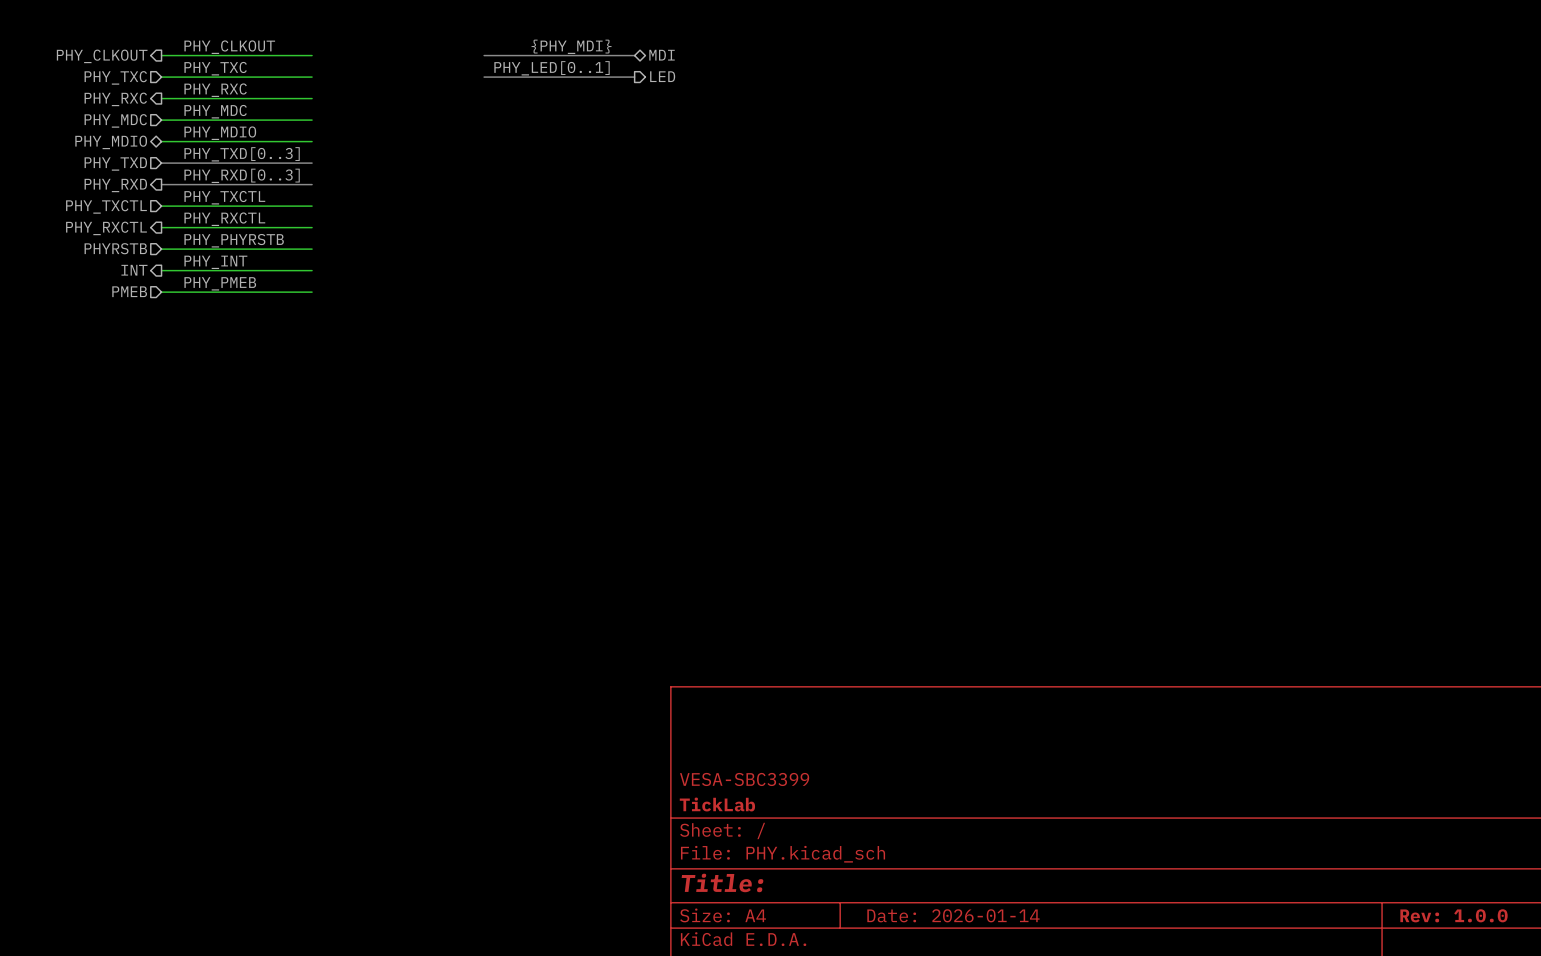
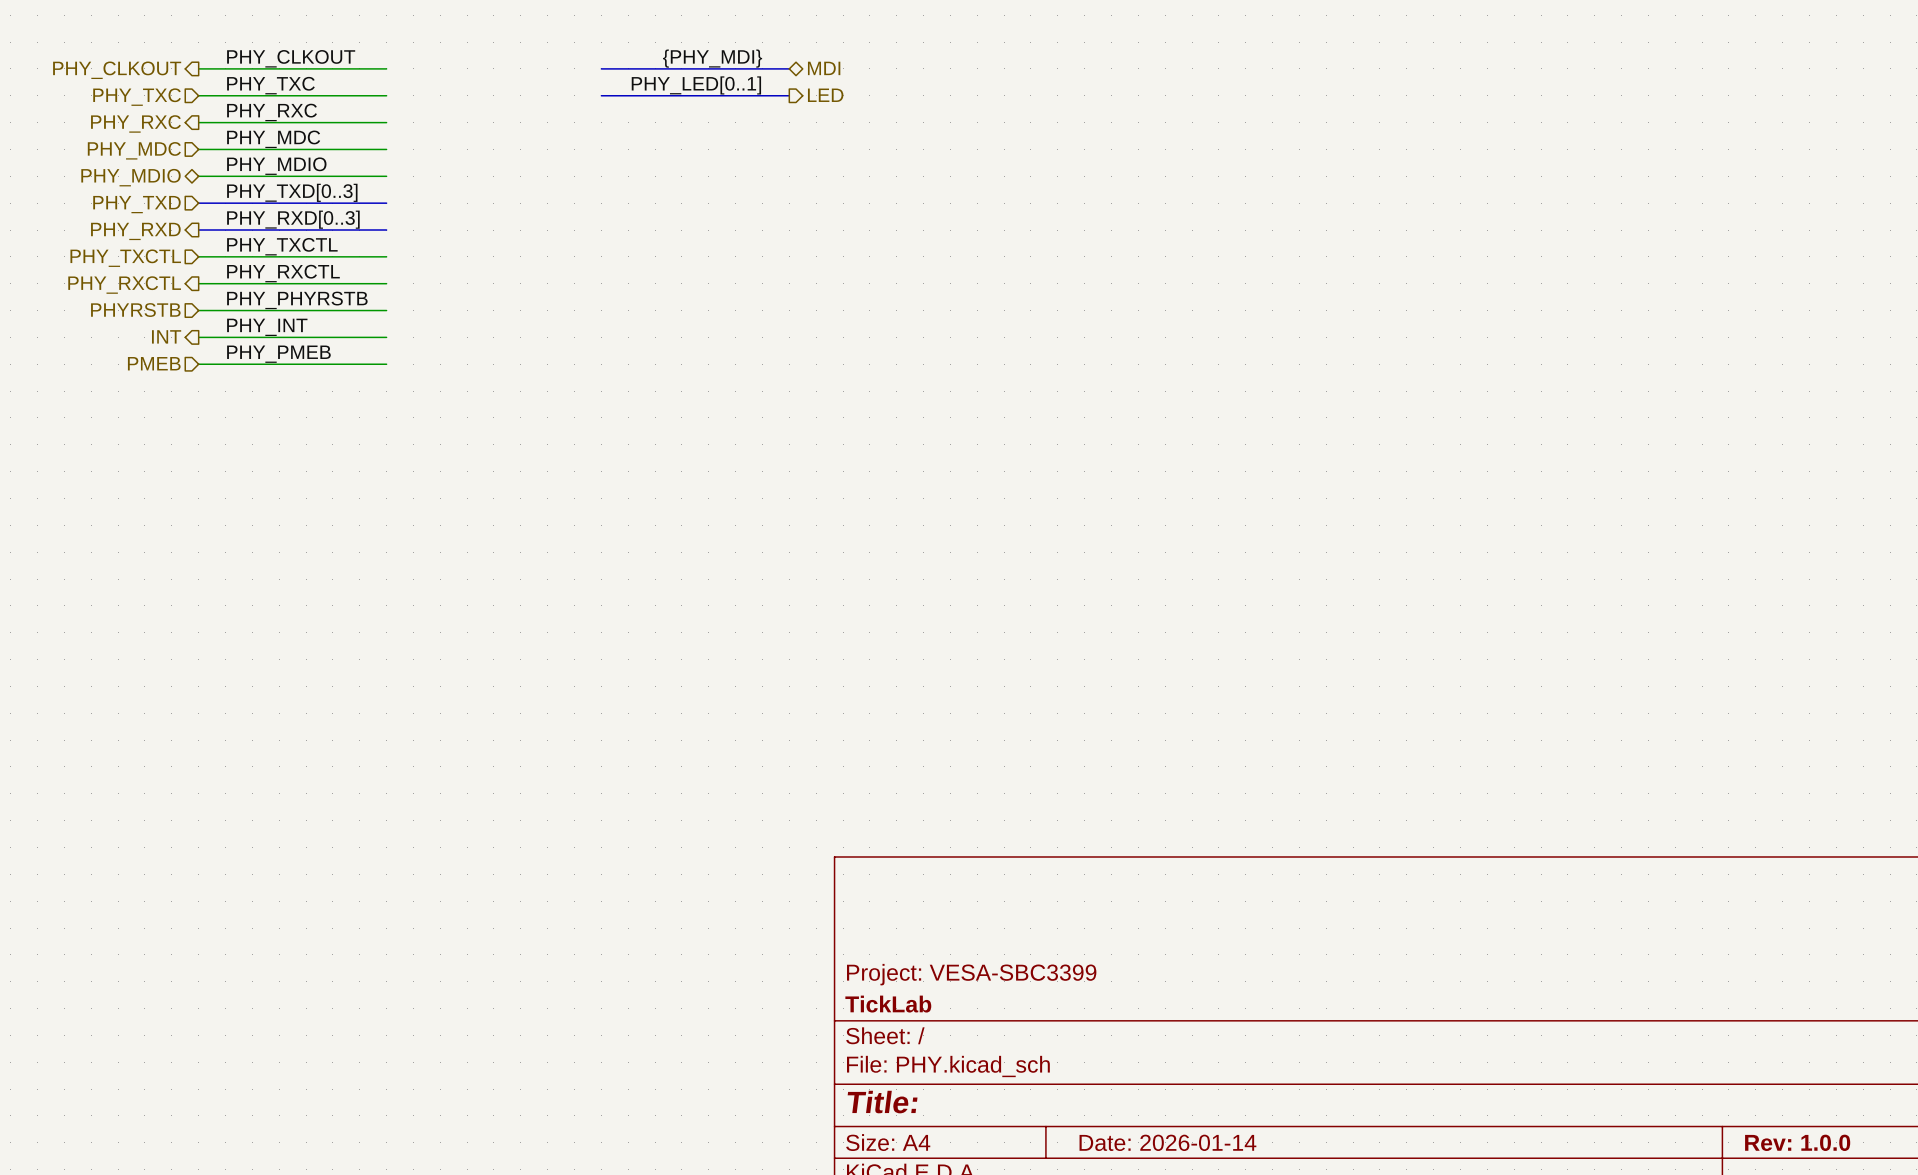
title block: VESA-SBC3399 (744, 779) -> Project: VESA-SBC3399 (971, 974)

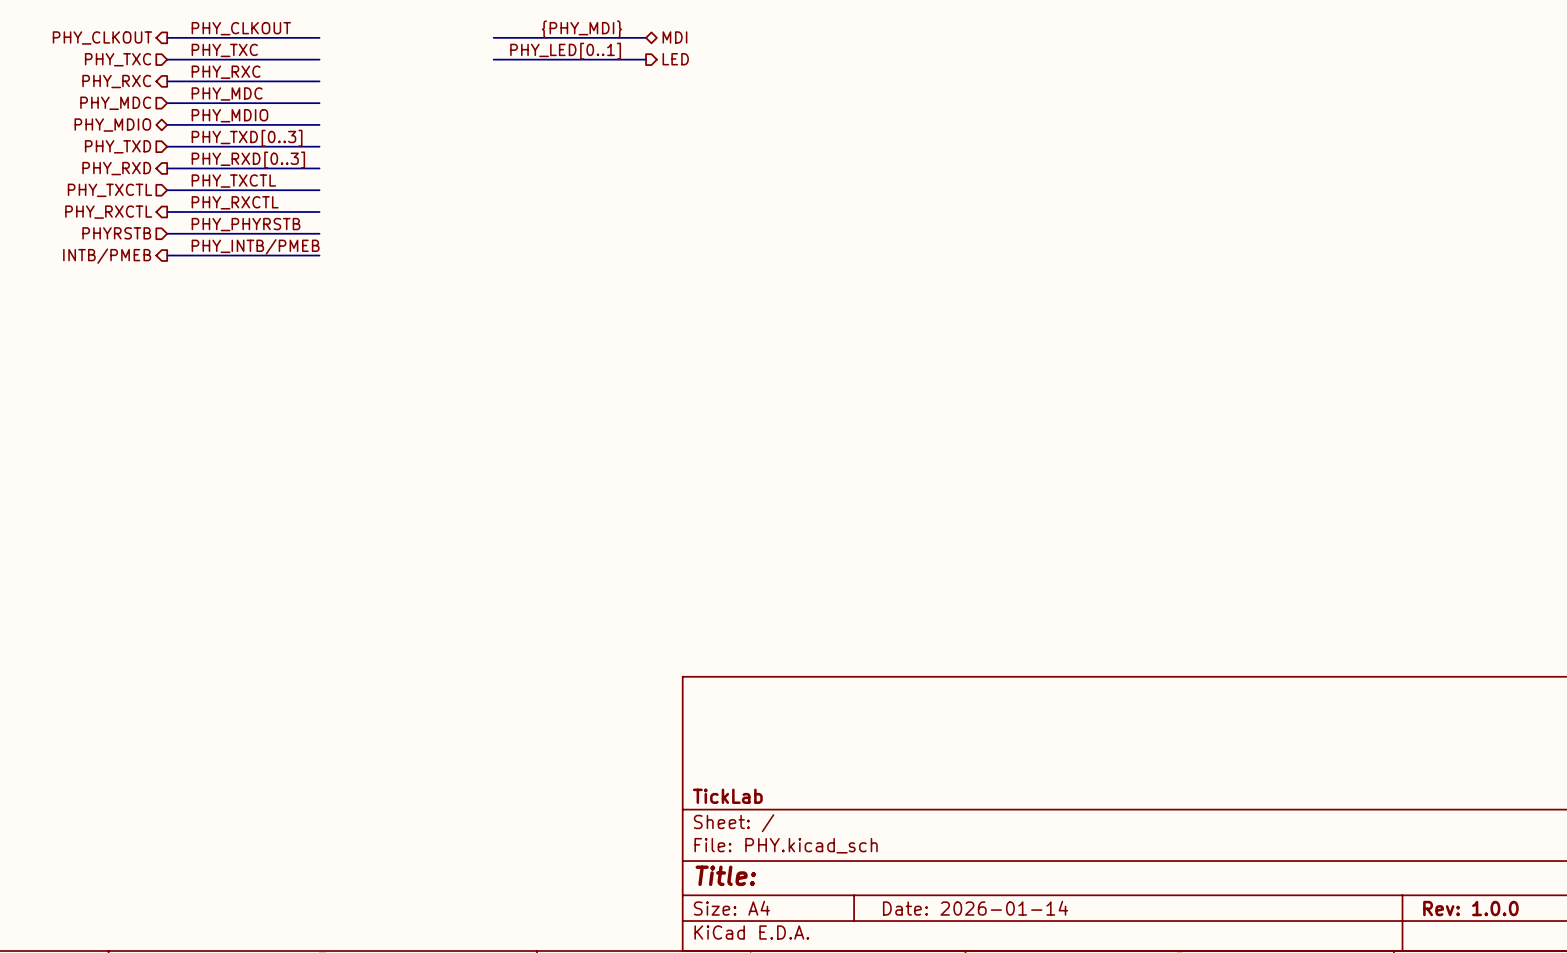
label: PHY_INT (267, 327) -> PHY_INTB/PMEB (255, 246)
hierarchical label: INT (166, 336) -> INTB/PMEB (107, 256)
label: PHY_PMEB (278, 354) -> none
hierarchical label: PMEB (154, 363) -> none
wire: (198, 364) (386, 364) -> none
title block: Project: VESA-SBC3399 (971, 974) -> none

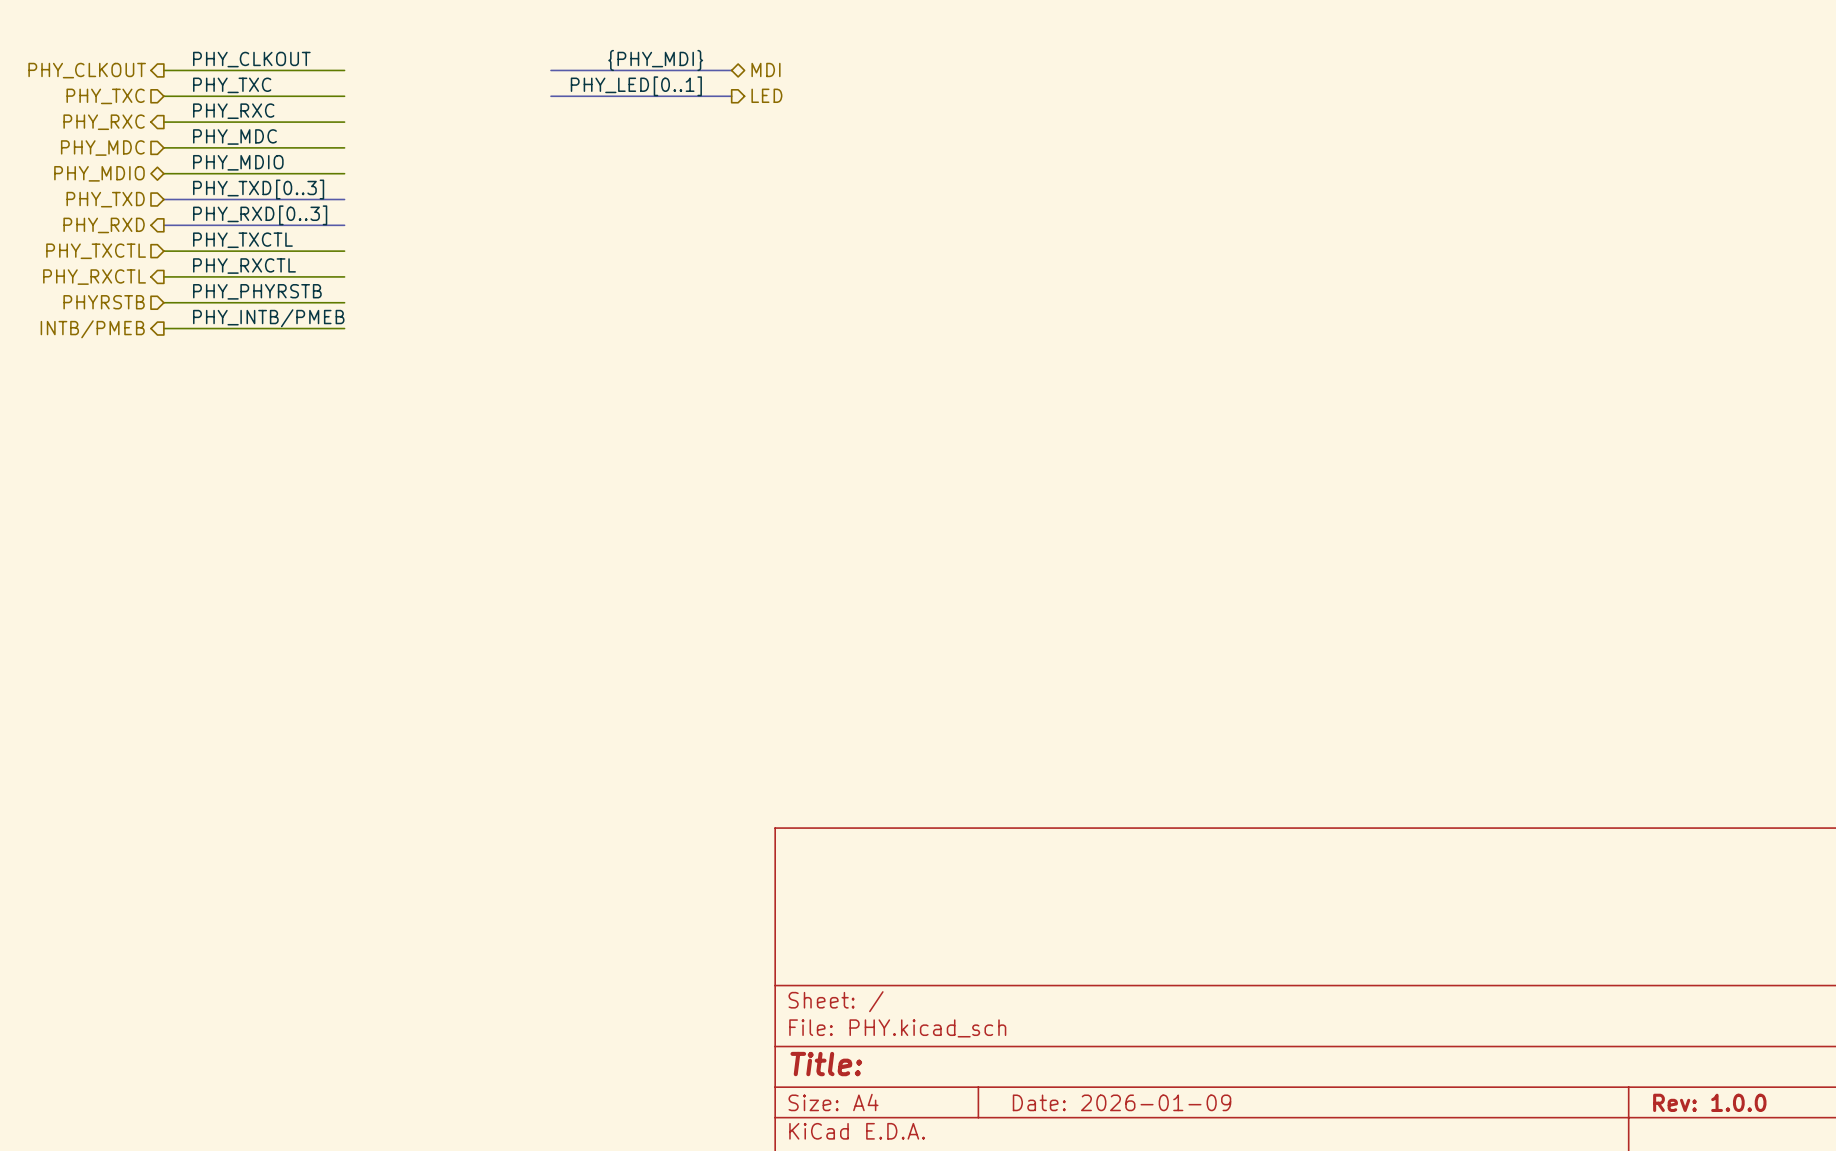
title block: TickLab (727, 796) -> none
title block: Date: 2026-01-14 (975, 908) -> Date: 2026-01-09 (1122, 1102)

